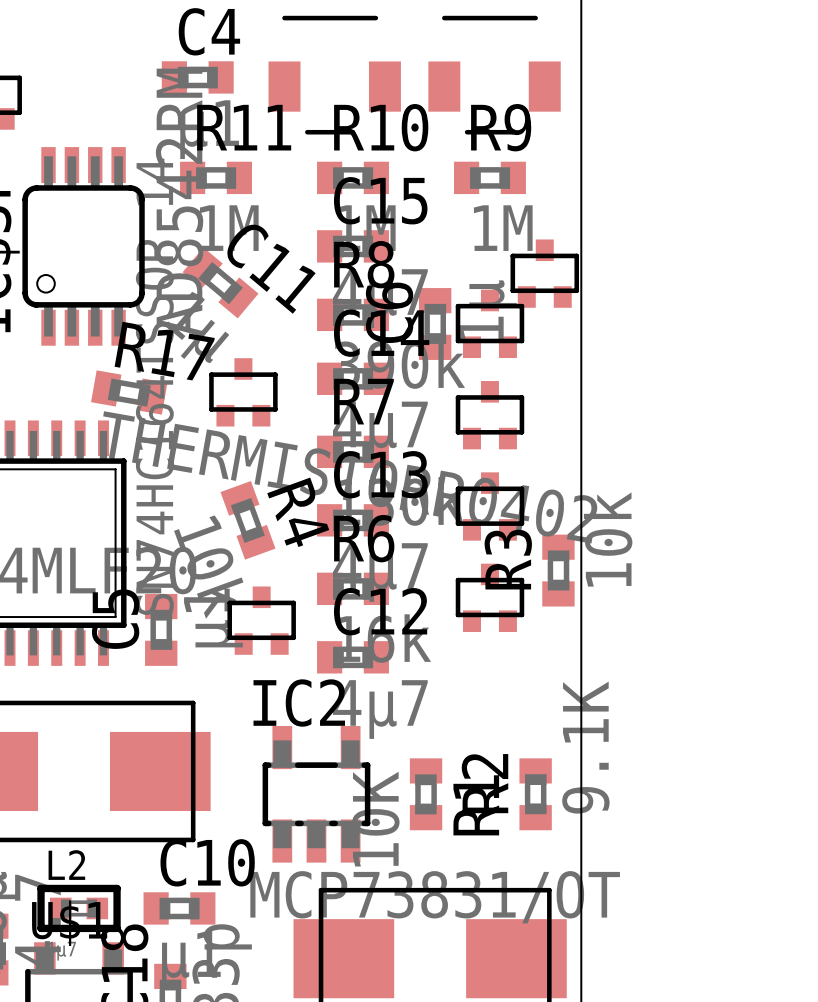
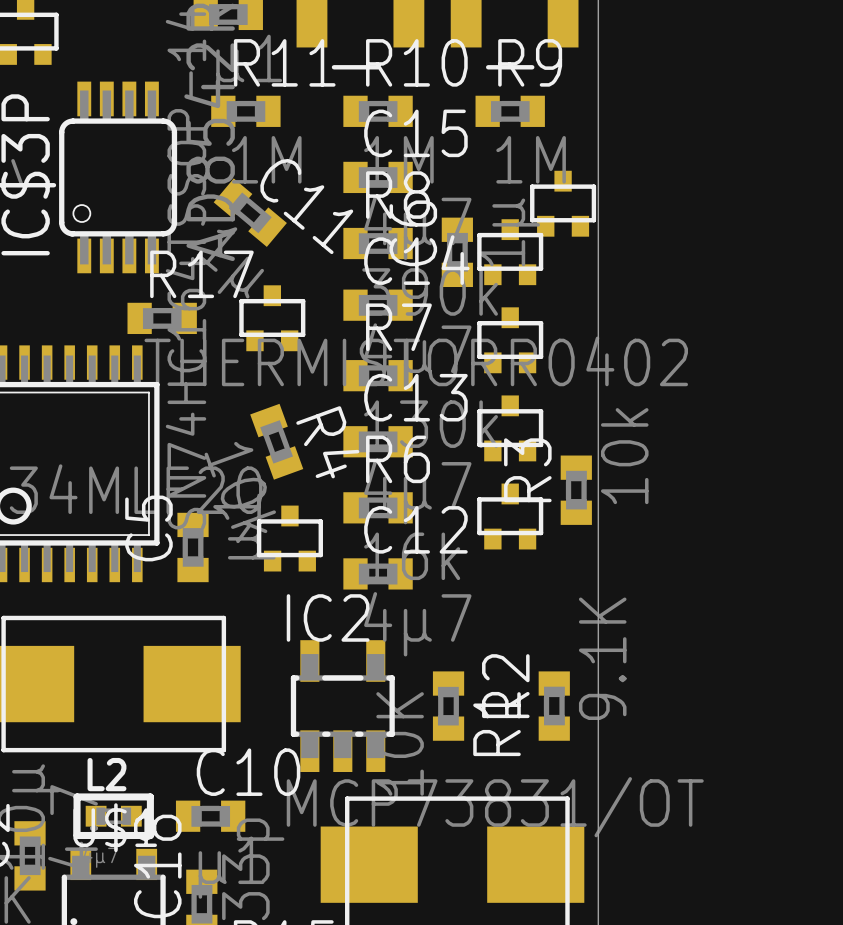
R17 rotation: 0° (129, 392) -> 10° counterclockwise (162, 318)

